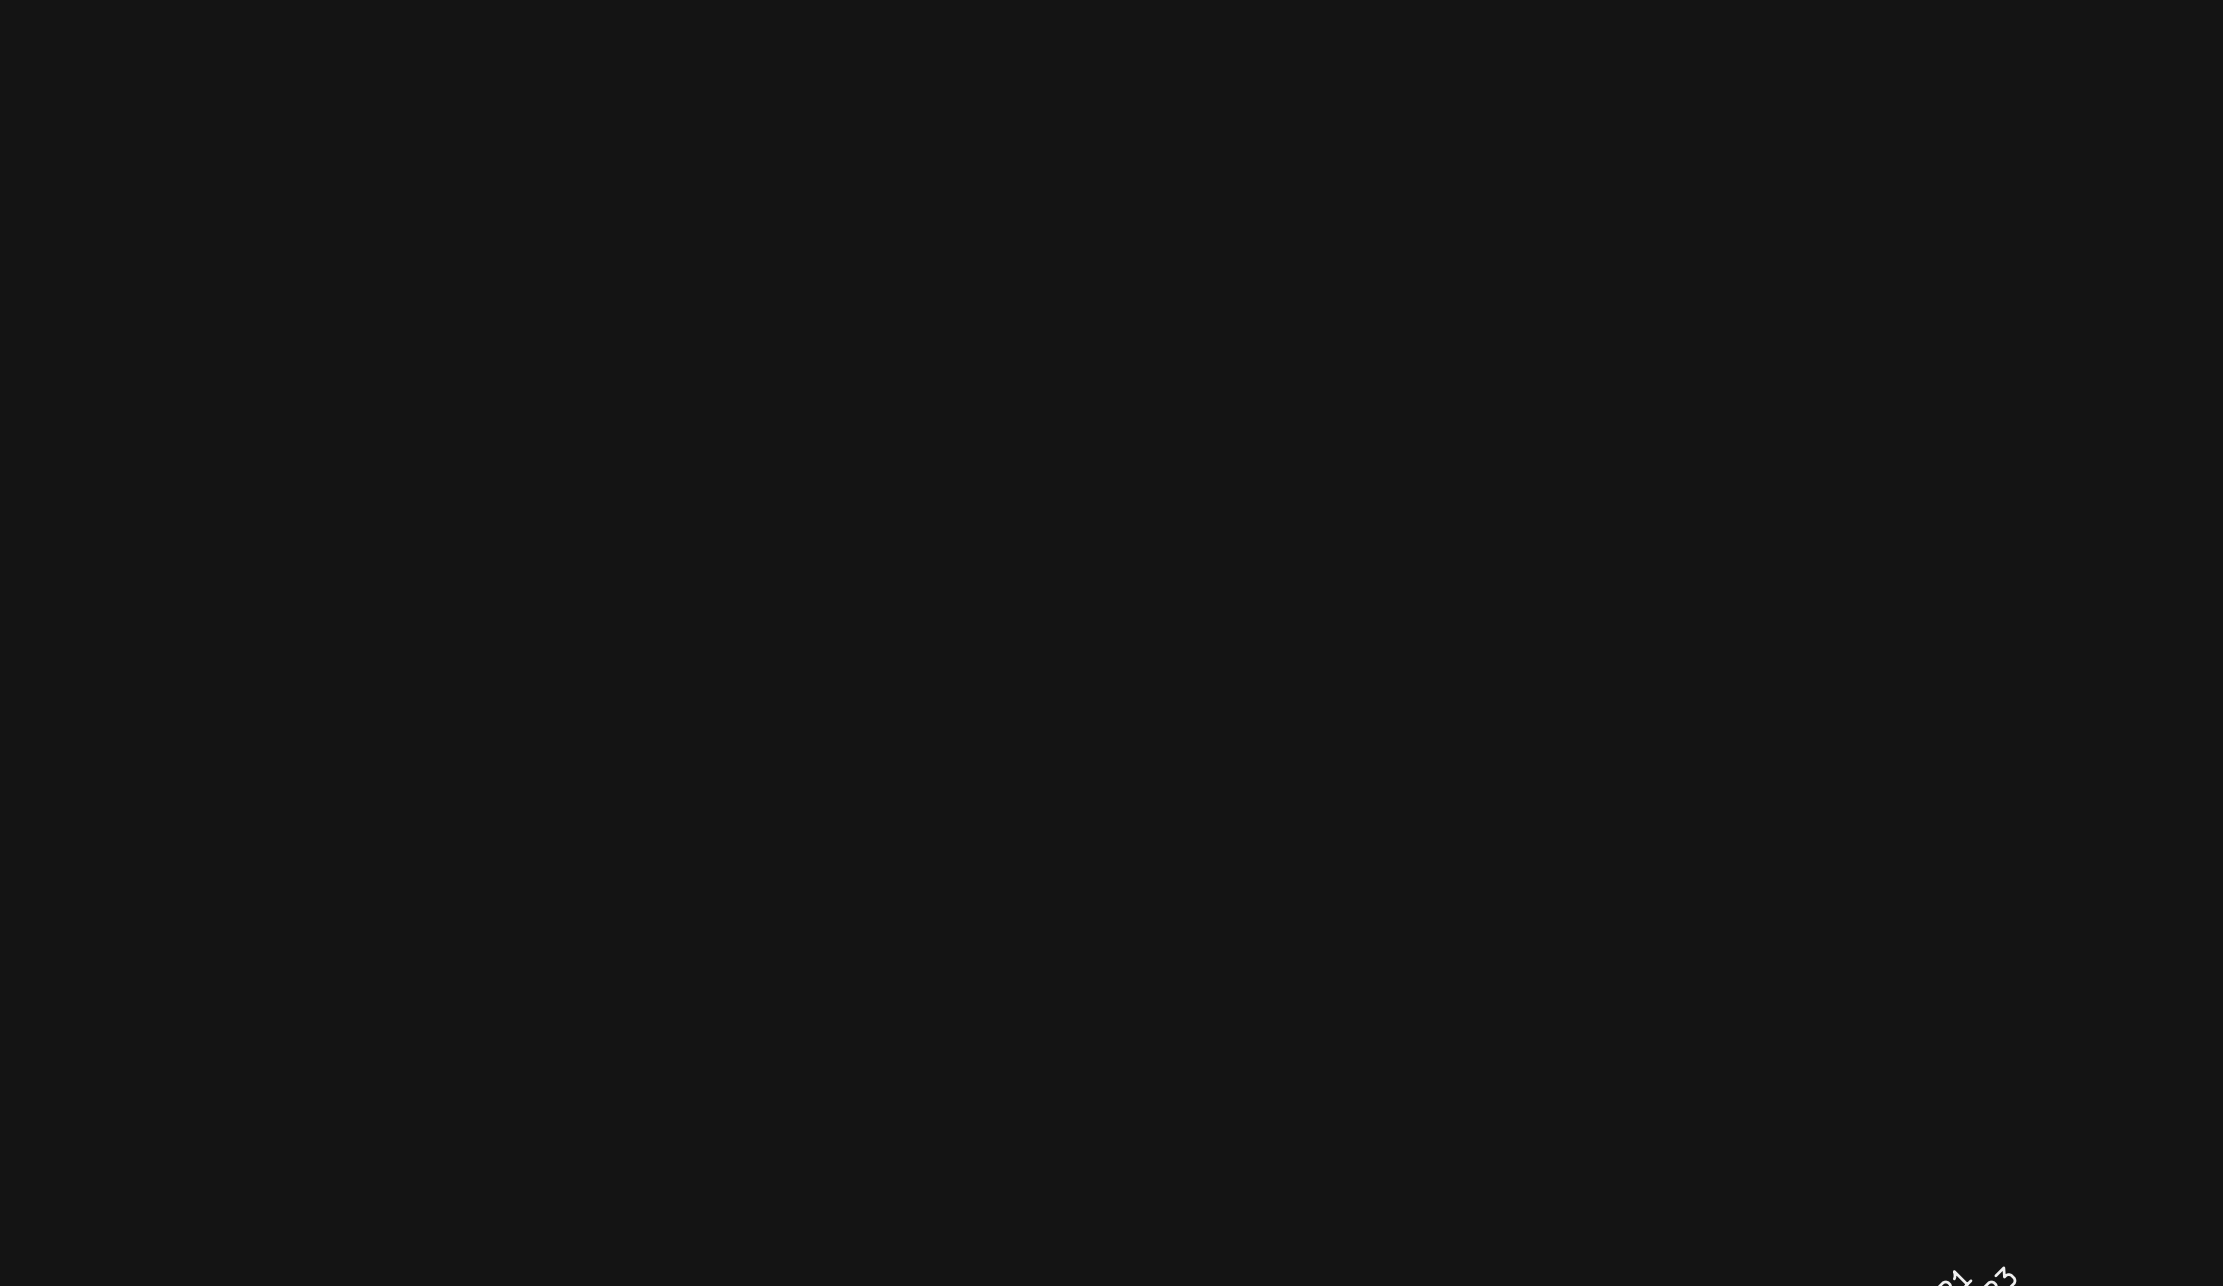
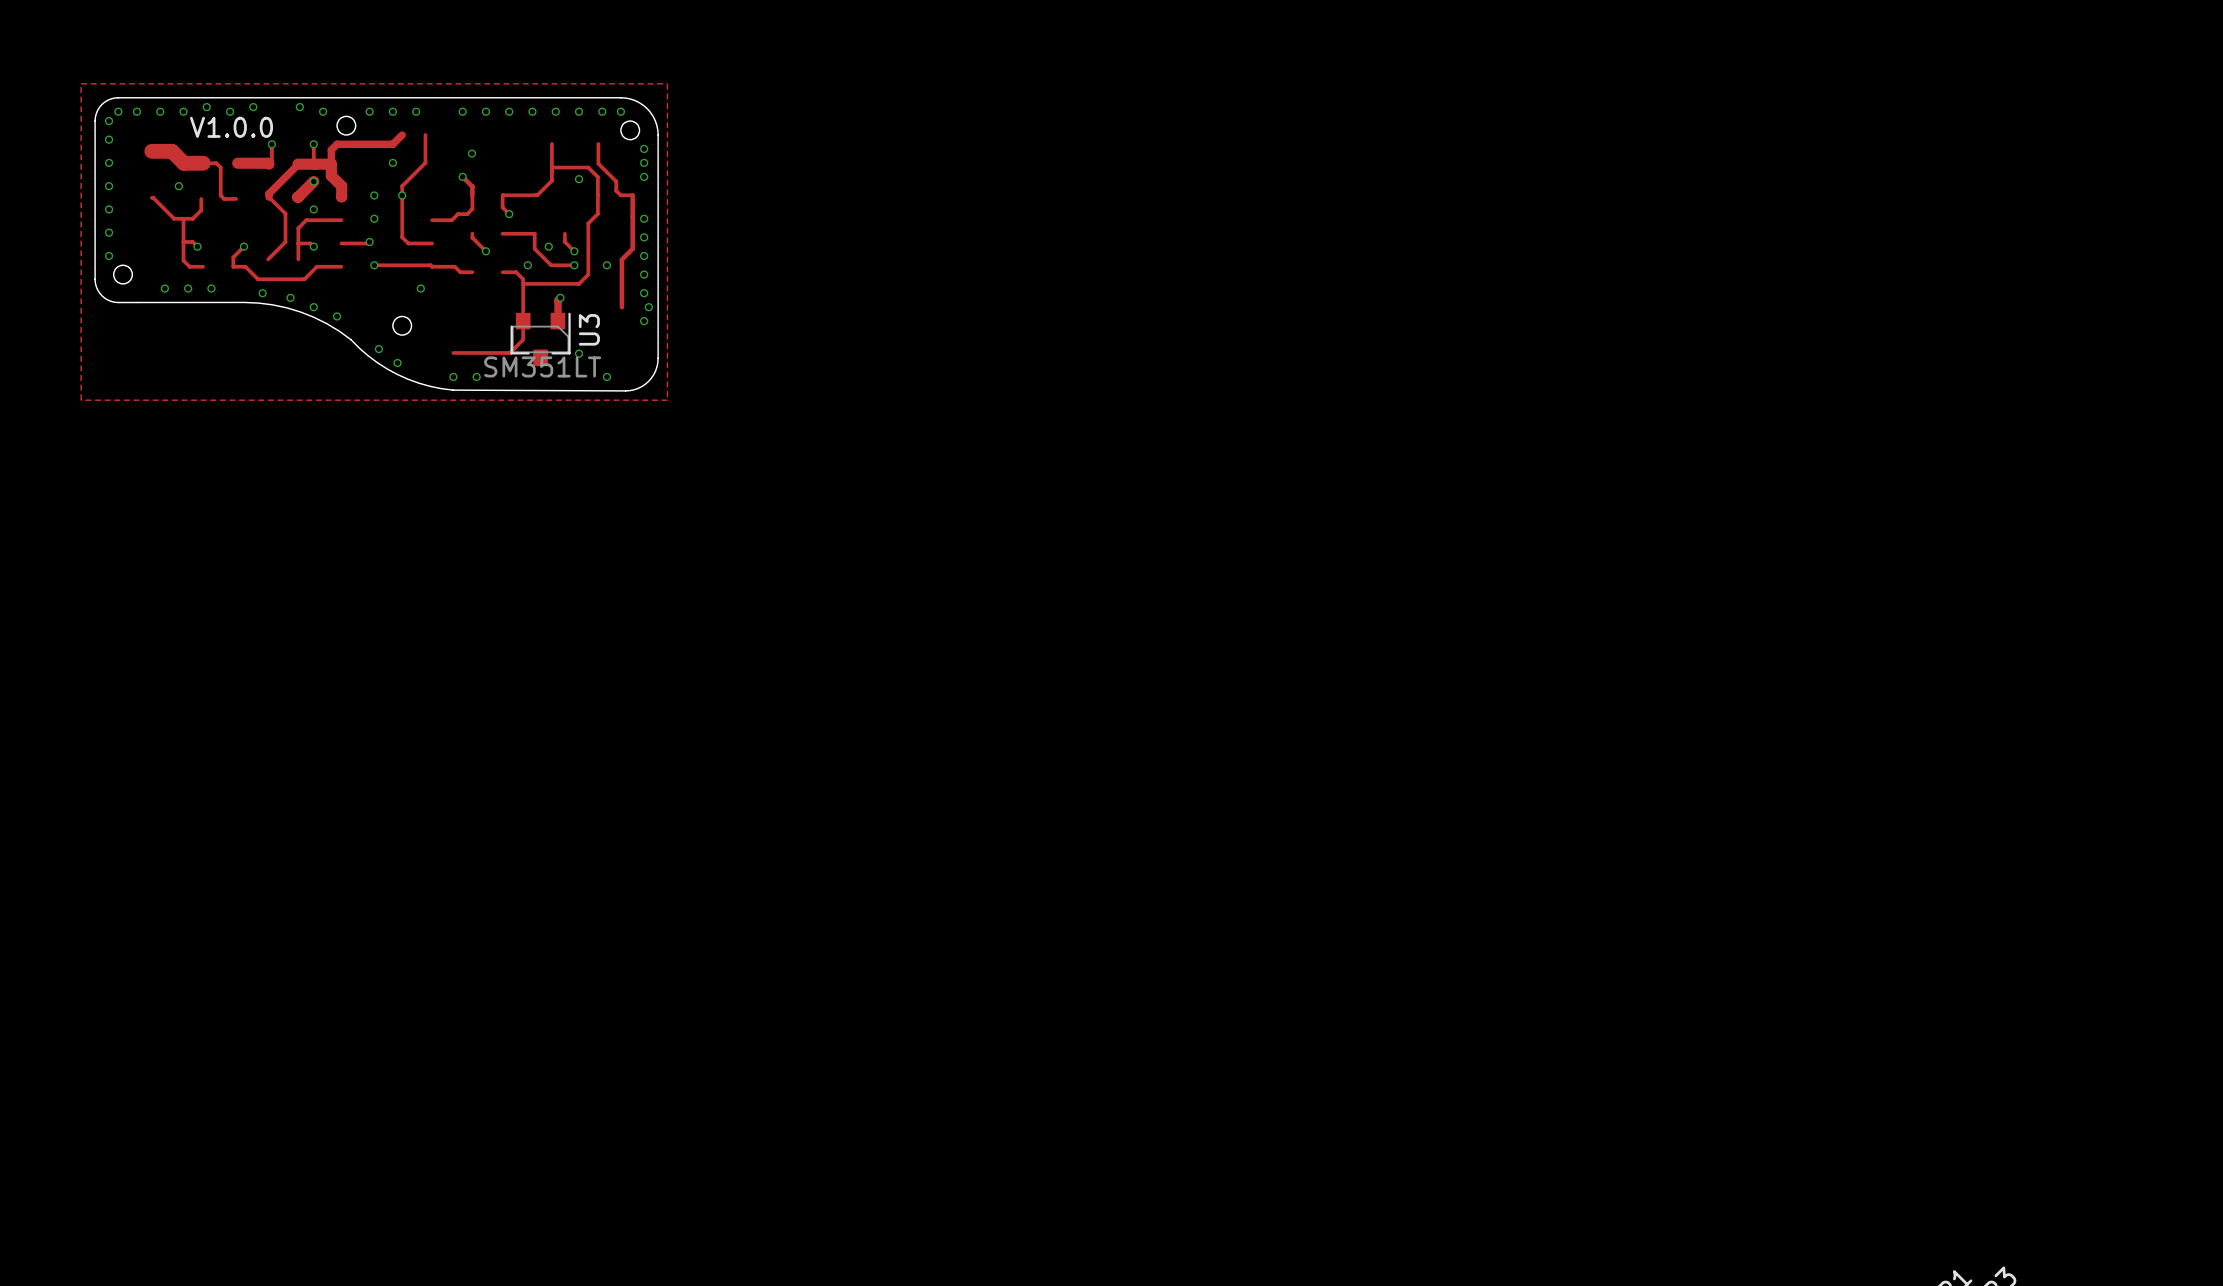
zone outline: none -> (81, 83) (81, 400) (667, 400) (667, 83) (81, 83)
board edge: none -> (118, 97) (620, 97) (639, 102) (653, 116) (658, 134) (658, 358) (653, 374) (645, 384) (629, 390) (441, 388) (418, 383) (397, 374) (377, 362) (351, 339) (327, 323) (286, 307) (258, 303) (118, 302) (106, 299) (98, 290) (95, 279) (95, 121) (96, 112) (101, 104) (109, 99) (118, 97)
via: none -> (206, 107)
via: none -> (253, 107)
via: none -> (299, 107)
via: none -> (118, 111)
via: none -> (136, 111)
via: none -> (160, 111)
via: none -> (183, 111)
via: none -> (230, 111)
via: none -> (323, 111)
via: none -> (369, 111)
via: none -> (392, 111)
via: none -> (416, 111)
via: none -> (462, 111)
via: none -> (485, 111)
via: none -> (509, 111)
via: none -> (532, 111)
via: none -> (555, 111)
via: none -> (579, 111)
via: none -> (602, 111)
via: none -> (620, 111)
round board edge: none -> [336, 115, 357, 136]
round board edge: none -> [620, 120, 640, 141]
via: none -> (109, 121)
text: none -> V1.0.0 (231, 127)
track: none -> (402, 134) (392, 144) (337, 144) (331, 150) (331, 164)
track: none -> (425, 134) (425, 162) (402, 186) (402, 237) (408, 243) (432, 243)
via: none -> (109, 139)
track: none -> (271, 144) (271, 161) (269, 164) (237, 163)
via: none -> (271, 144)
track: none -> (313, 144) (315, 164)
via: none -> (313, 144)
track: none -> (551, 144) (551, 180) (537, 195) (502, 195) (502, 207) (509, 214)
track: none -> (598, 144) (598, 163) (616, 181) (616, 190) (620, 195) (632, 195) (632, 248) (621, 259) (621, 307)
via: none -> (644, 148)
track: none -> (151, 151) (171, 151) (183, 163) (216, 163) (220, 167) (220, 195) (224, 198) (236, 198)
via: none -> (472, 153)
via: none -> (109, 162)
via: none -> (392, 162)
via: none -> (644, 162)
track: none -> (331, 164) (297, 164) (269, 193) (269, 197)
track: none -> (331, 164) (331, 175) (341, 186) (341, 196)
track: none -> (551, 166) (588, 167) (597, 177) (597, 213) (588, 223) (588, 274) (579, 283) (523, 283)
track: none -> (462, 176) (472, 186) (472, 209) (467, 214) (458, 214) (451, 220) (432, 220)
via: none -> (462, 176)
via: none -> (644, 176)
via: none -> (579, 179)
track: none -> (313, 181) (297, 197)
via: none -> (313, 181)
via: none -> (109, 186)
via: none -> (178, 186)
via: none -> (374, 195)
via: none -> (402, 195)
track: none -> (151, 197) (174, 218) (192, 218) (201, 210) (201, 198)
track: none -> (269, 197) (285, 213) (285, 242) (268, 259)
via: none -> (109, 209)
via: none -> (313, 209)
via: none -> (509, 214)
track: none -> (183, 218) (183, 260) (189, 266) (203, 266)
via: none -> (374, 218)
via: none -> (644, 218)
track: none -> (341, 220) (306, 220) (298, 228) (298, 259)
via: none -> (109, 232)
track: none -> (472, 233) (472, 237) (485, 251)
track: none -> (502, 233) (534, 233) (534, 248) (551, 265) (574, 265)
track: none -> (564, 233) (564, 241) (574, 251)
via: none -> (644, 237)
track: none -> (183, 242) (192, 242) (197, 246)
track: none -> (369, 242) (341, 243)
via: none -> (369, 242)
track: none -> (298, 243) (310, 243) (313, 246)
via: none -> (197, 246)
track: none -> (244, 246) (233, 257) (233, 266) (245, 266) (257, 279) (304, 279) (316, 266) (341, 266)
via: none -> (244, 246)
via: none -> (313, 246)
via: none -> (548, 246)
via: none -> (485, 251)
via: none -> (574, 251)
via: none -> (109, 255)
via: none -> (644, 255)
round board edge: none -> [113, 264, 133, 285]
track: none -> (374, 265) (454, 266) (460, 272) (472, 272)
via: none -> (374, 265)
via: none -> (527, 265)
via: none -> (574, 265)
via: none -> (606, 265)
track: none -> (502, 272) (516, 272) (523, 279) (523, 339) (509, 352) (453, 352)
via: none -> (644, 274)
via: none -> (164, 288)
via: none -> (188, 288)
via: none -> (211, 288)
via: none -> (420, 288)
via: none -> (262, 293)
via: none -> (644, 293)
via: none -> (290, 297)
track: none -> (560, 297) (557, 300) (557, 321)
via: none -> (560, 297)
via: none -> (313, 307)
via: none -> (648, 307)
via: none -> (337, 316)
round board edge: none -> [392, 316, 412, 336]
via: none -> (644, 321)
U3: none -> SM351LT (540, 339)
via: none -> (378, 349)
via: none -> (579, 353)
via: none -> (397, 363)
via: none -> (453, 376)
via: none -> (476, 376)
via: none -> (606, 376)

